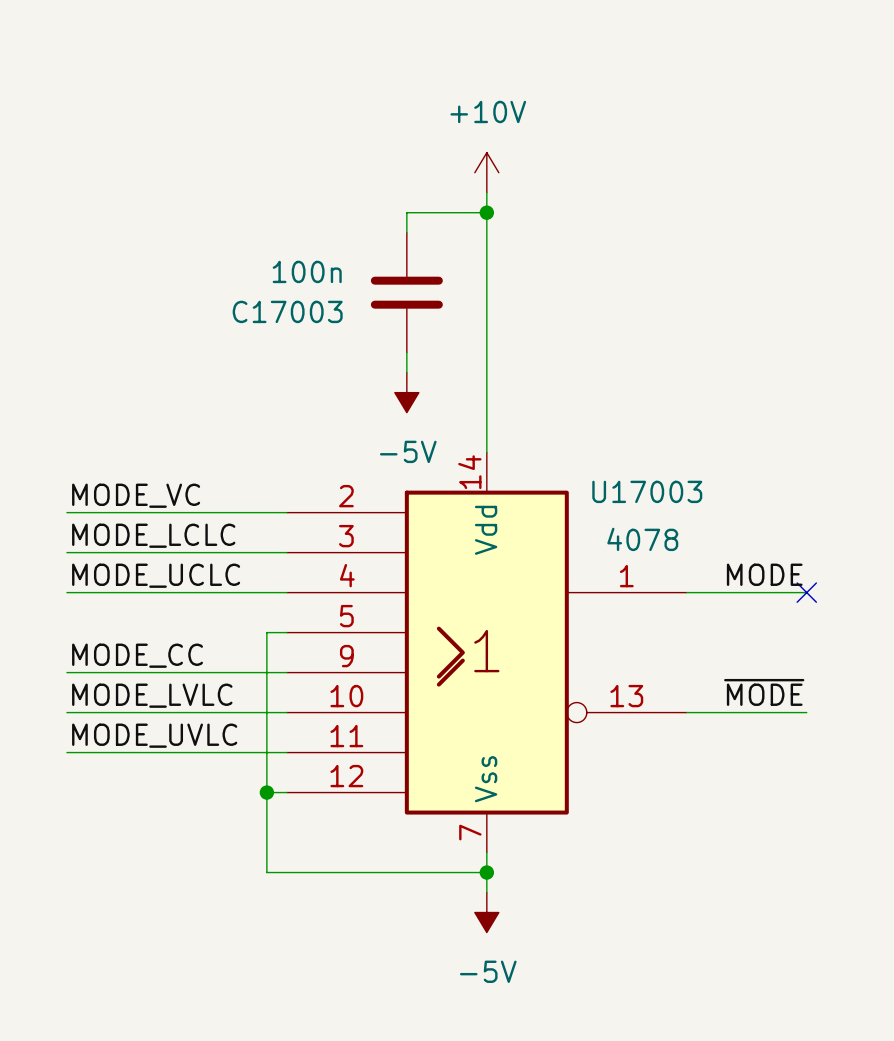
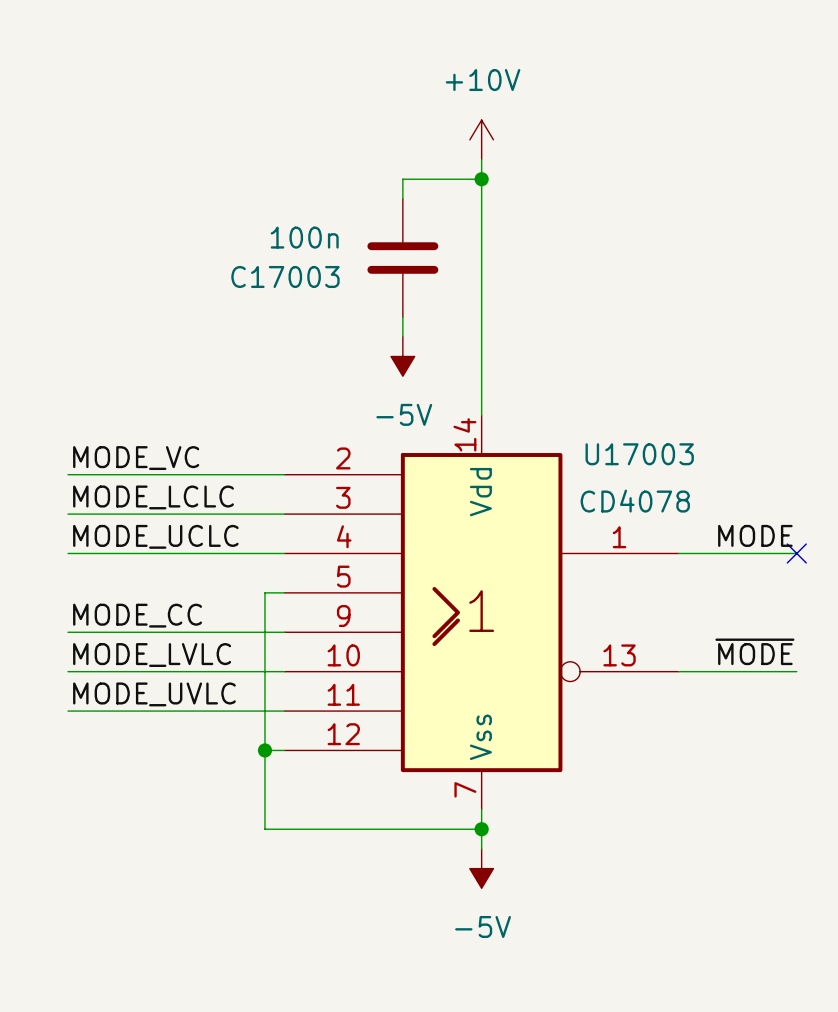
U17003 value: 4078 (642, 539) -> CD4078 (635, 501)

